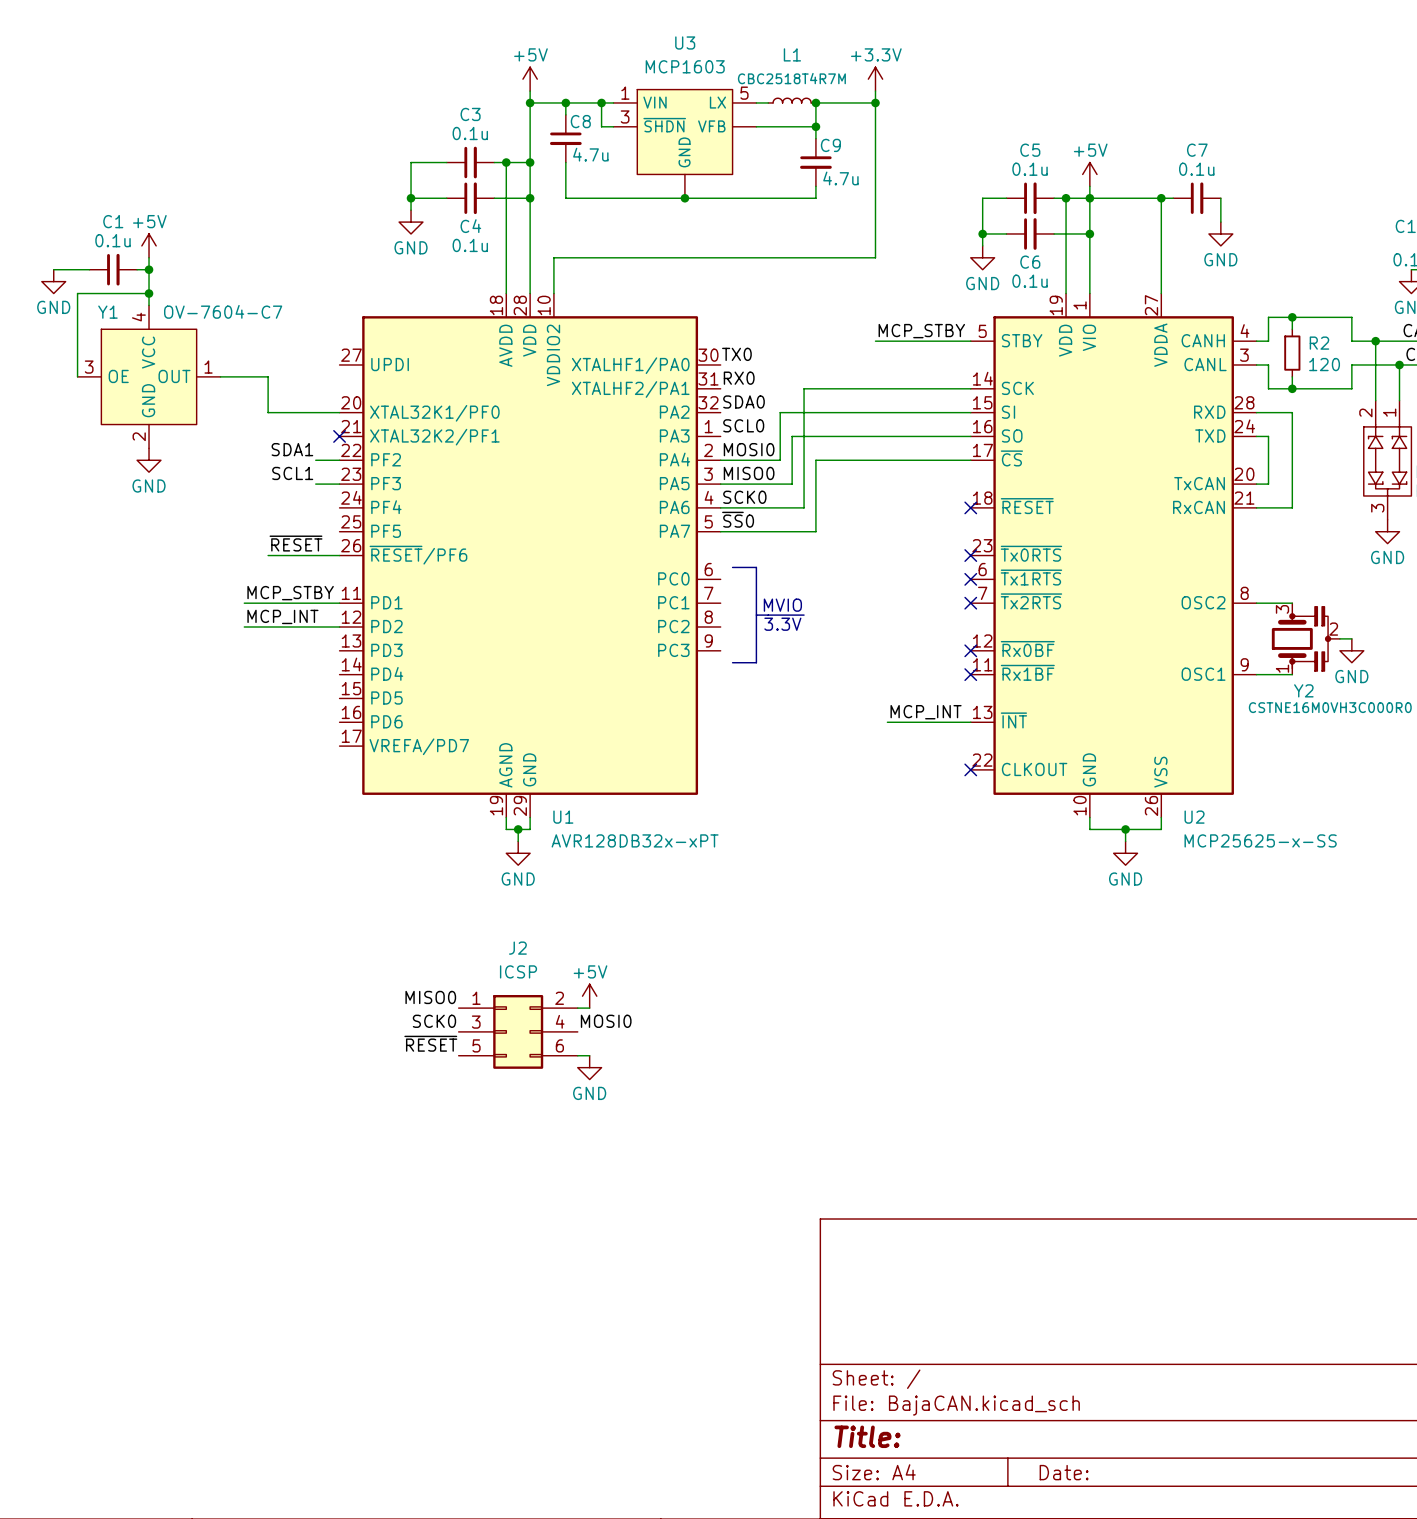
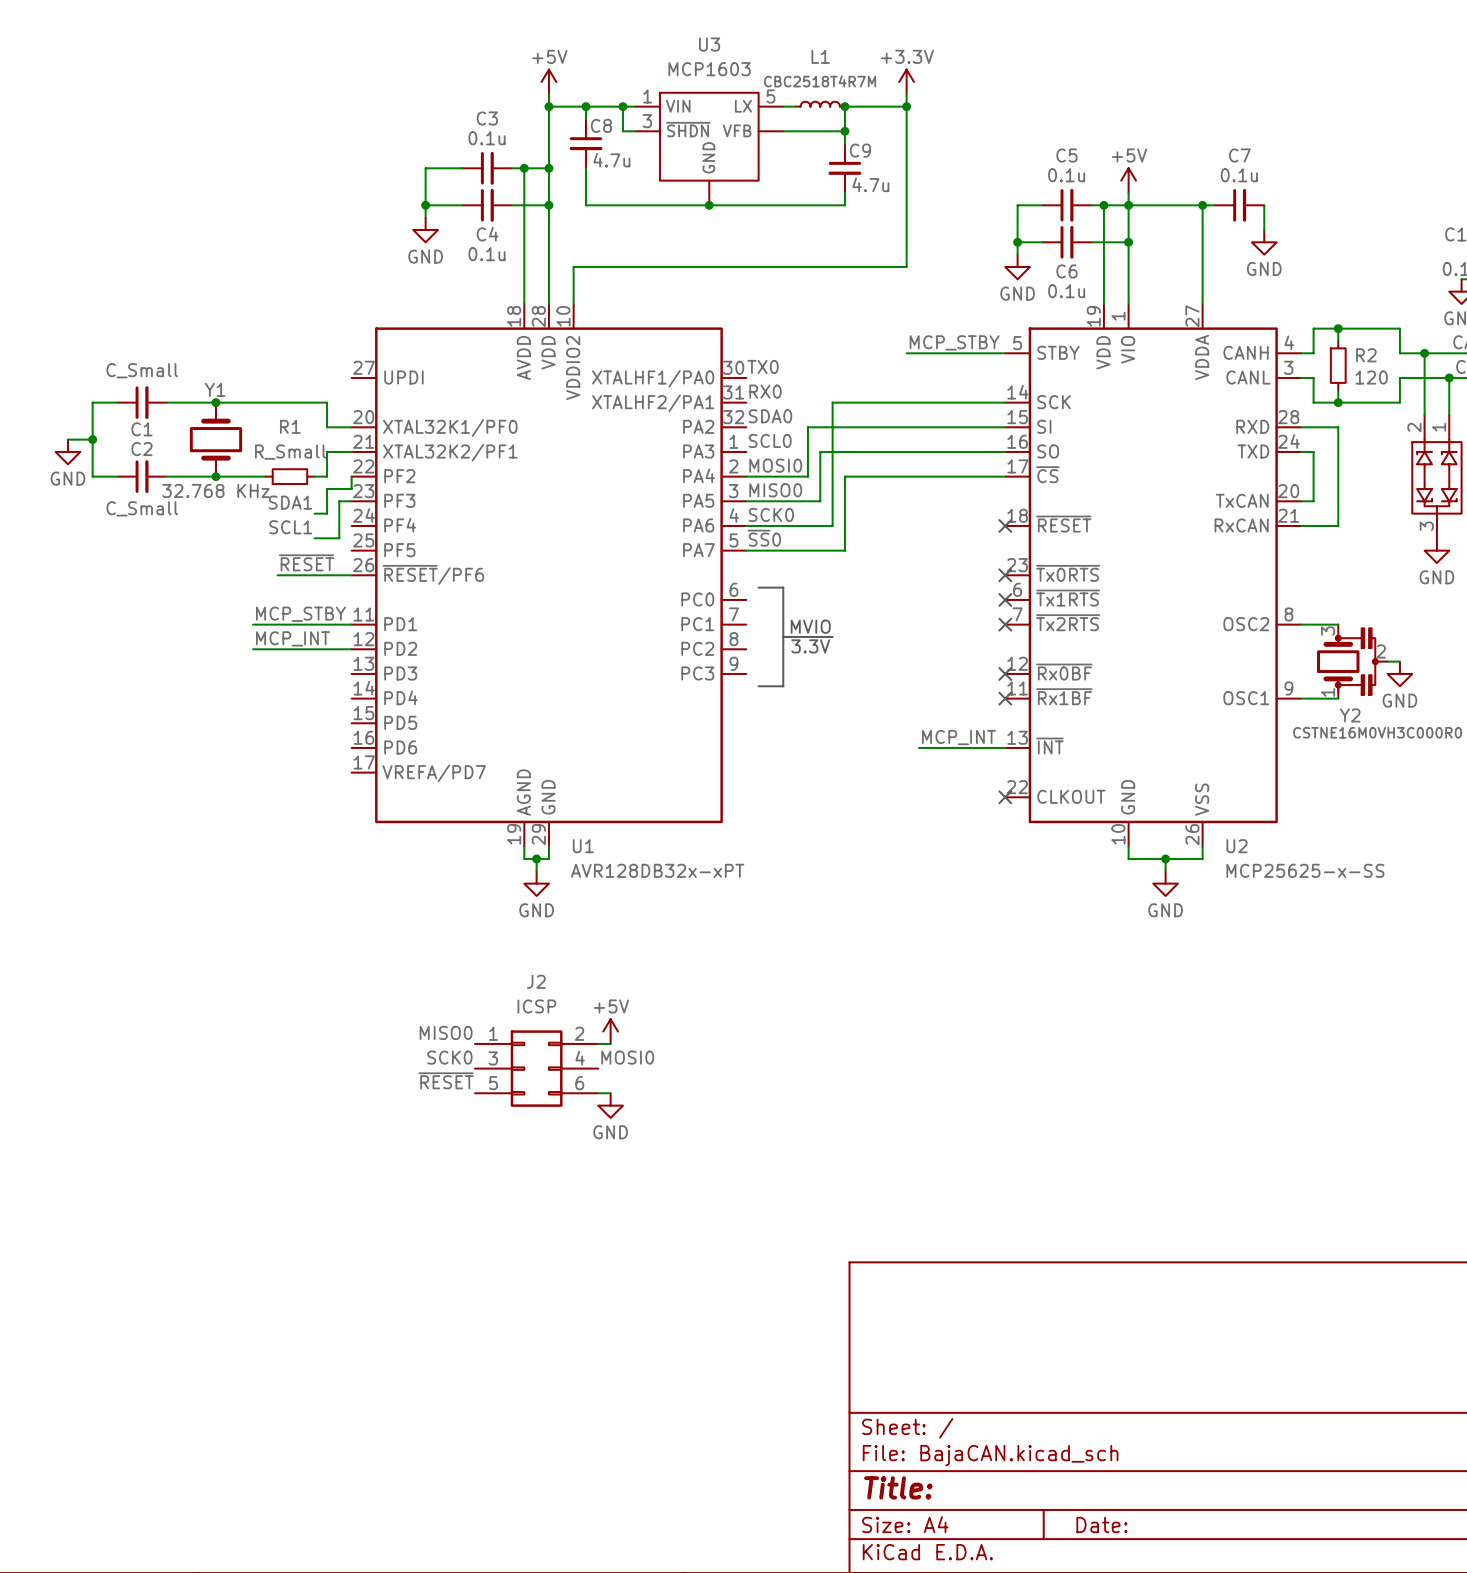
C1 name position: C1 (113, 221) -> C1 (141, 429)
C1 value: 0.1u (113, 240) -> C_Small (142, 370)
power symbol: +5V (149, 245) -> none
wire: (149, 257) (149, 305) -> none
wire: (53, 269) (89, 269) -> none
C1 position: (113, 269) -> (141, 402)
wire: (137, 269) (149, 269) -> none
junction: (149, 269) -> none
power symbol: GND (53, 281) -> none
wire: (149, 293) (77, 293) (77, 376) -> none
junction: (149, 293) -> none
Y1 symbol: [77, 305, 221, 449] -> [189, 402, 243, 477]
Y1 value: OV-7604-C7 (223, 311) -> 32.768 KHz (215, 490)
Y1 name position: Y1 (107, 312) -> Y1 (215, 389)
wire: (220, 376) (268, 376) (268, 412) (315, 412) -> (166, 402) (326, 402) (326, 427)
wire: none -> (117, 402) (92, 402) (92, 476) (117, 476)
junction: none -> (215, 402)
wire: none -> (67, 439) (92, 439)
junction: none -> (92, 439)
power symbol: none -> GND (67, 451)
wire: none -> (351, 451) (326, 451) (326, 476) (314, 476)
no-connect mark: (339, 436) -> none
label position: SDA1 (292, 449) -> SDA1 (290, 502)
C2: none -> C_Small (141, 476)
power symbol: GND (149, 460) -> none
wire: none -> (166, 476) (265, 476)
junction: none -> (215, 476)
R1: none -> R_Small (289, 476)
wire: (315, 460) (339, 460) -> (314, 513) (326, 513) (326, 488) (351, 488) (351, 476)
label position: SCL1 (292, 473) -> SCL1 (290, 527)
wire: (315, 484) (327, 484) -> (314, 538) (339, 538) (339, 501)

